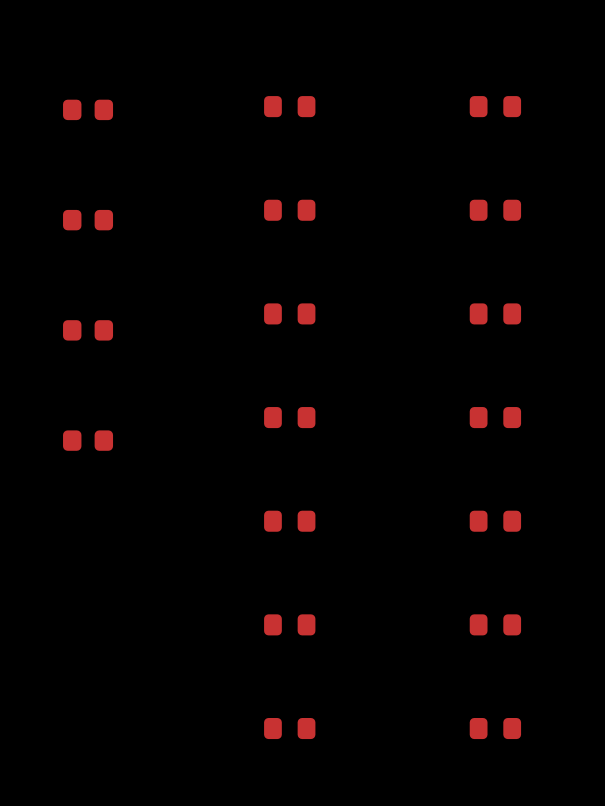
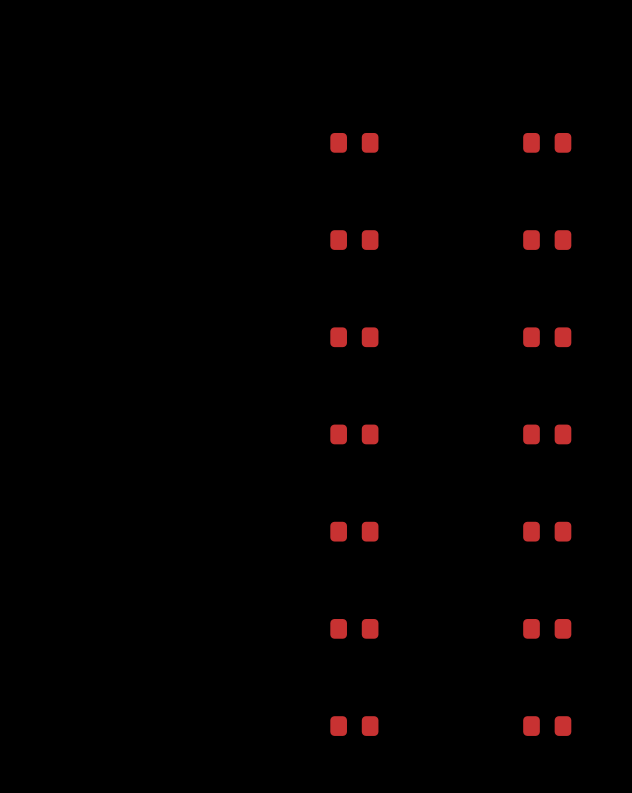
part: (88, 109) -> none
part: (88, 220) -> none
part: (88, 330) -> none
part: (88, 440) -> none

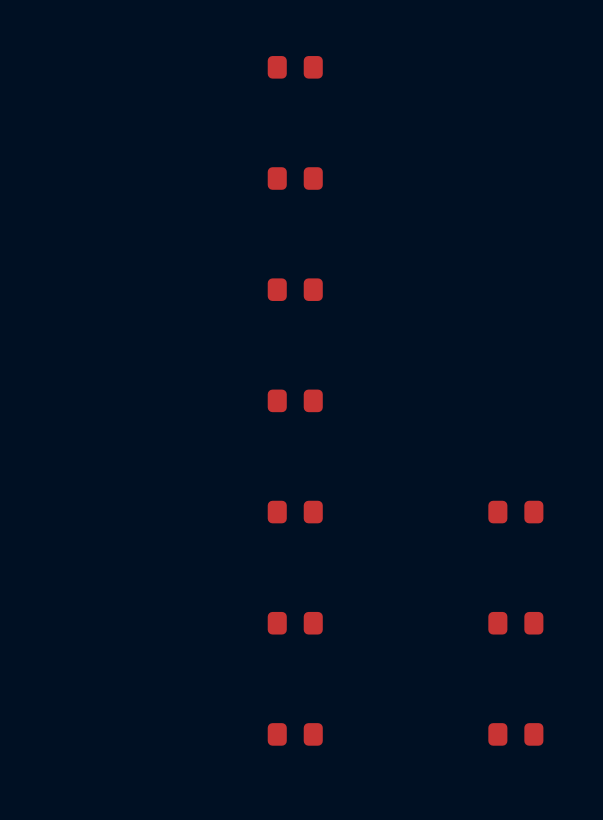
part: (547, 142) -> none
part: (547, 240) -> none
part: (547, 337) -> none
part: (547, 434) -> none

